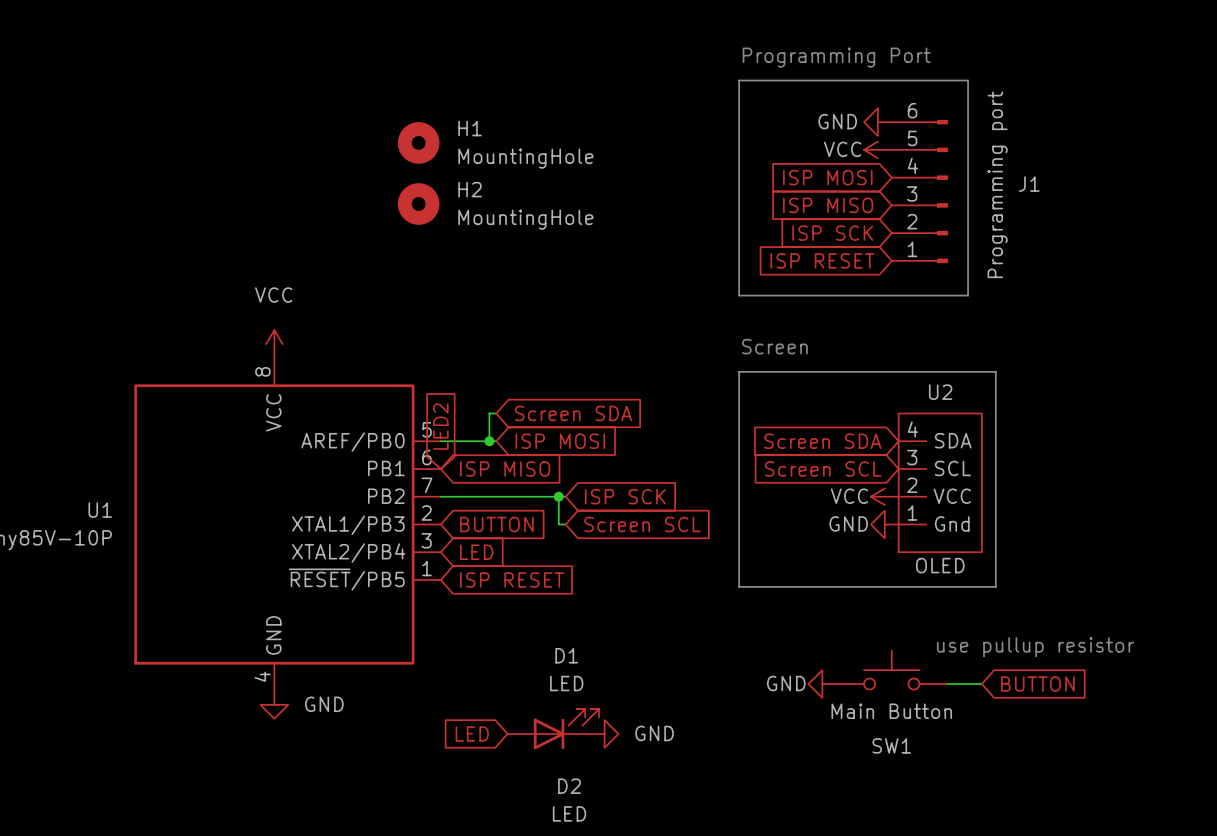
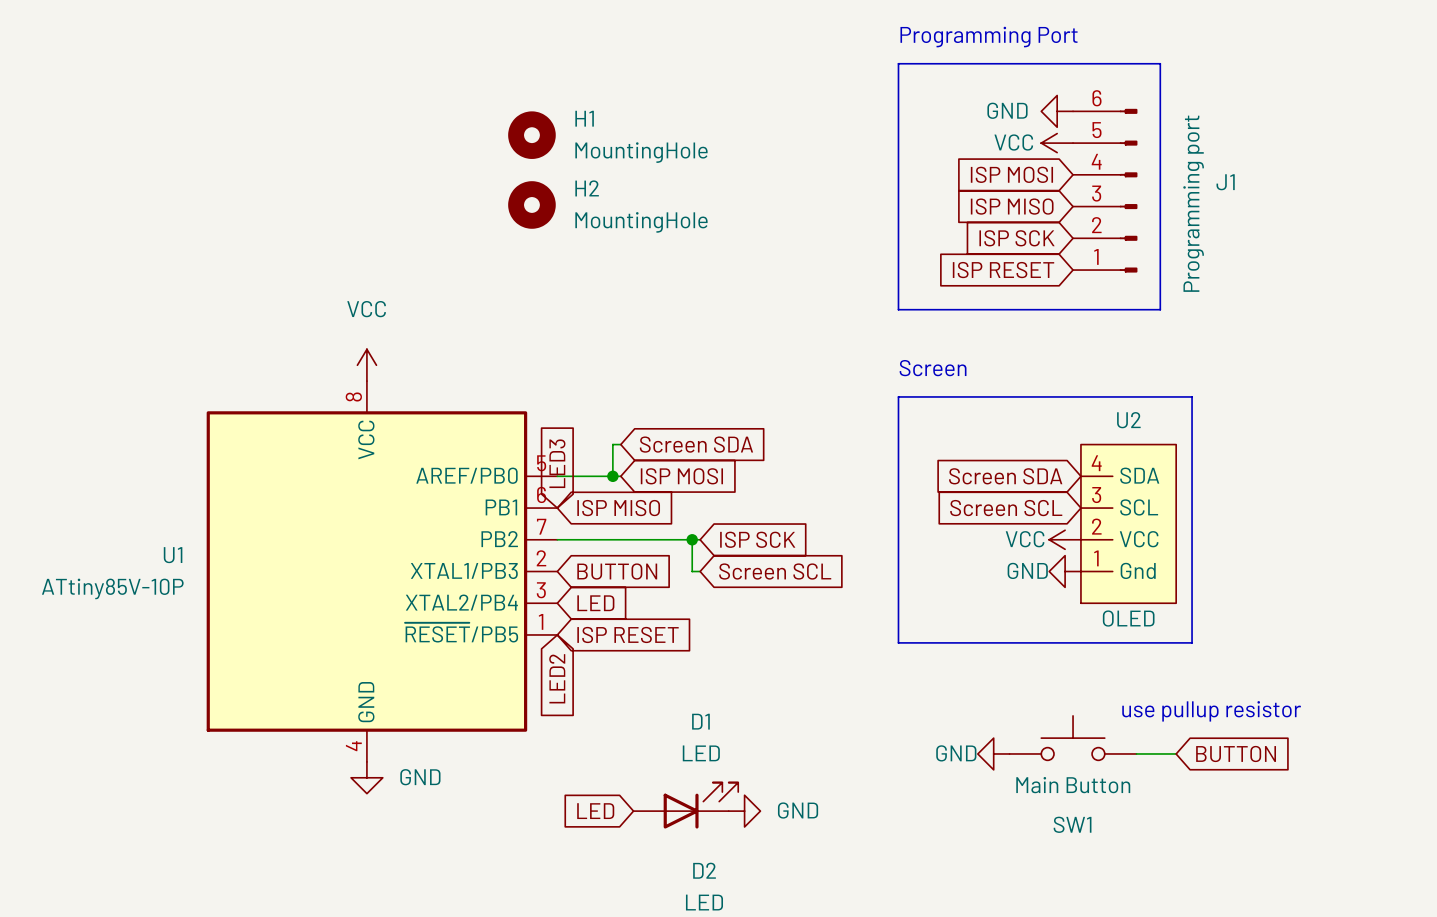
global label: LED2 (440, 426) -> LED3 (557, 463)
global label: none -> LED2 (557, 678)

